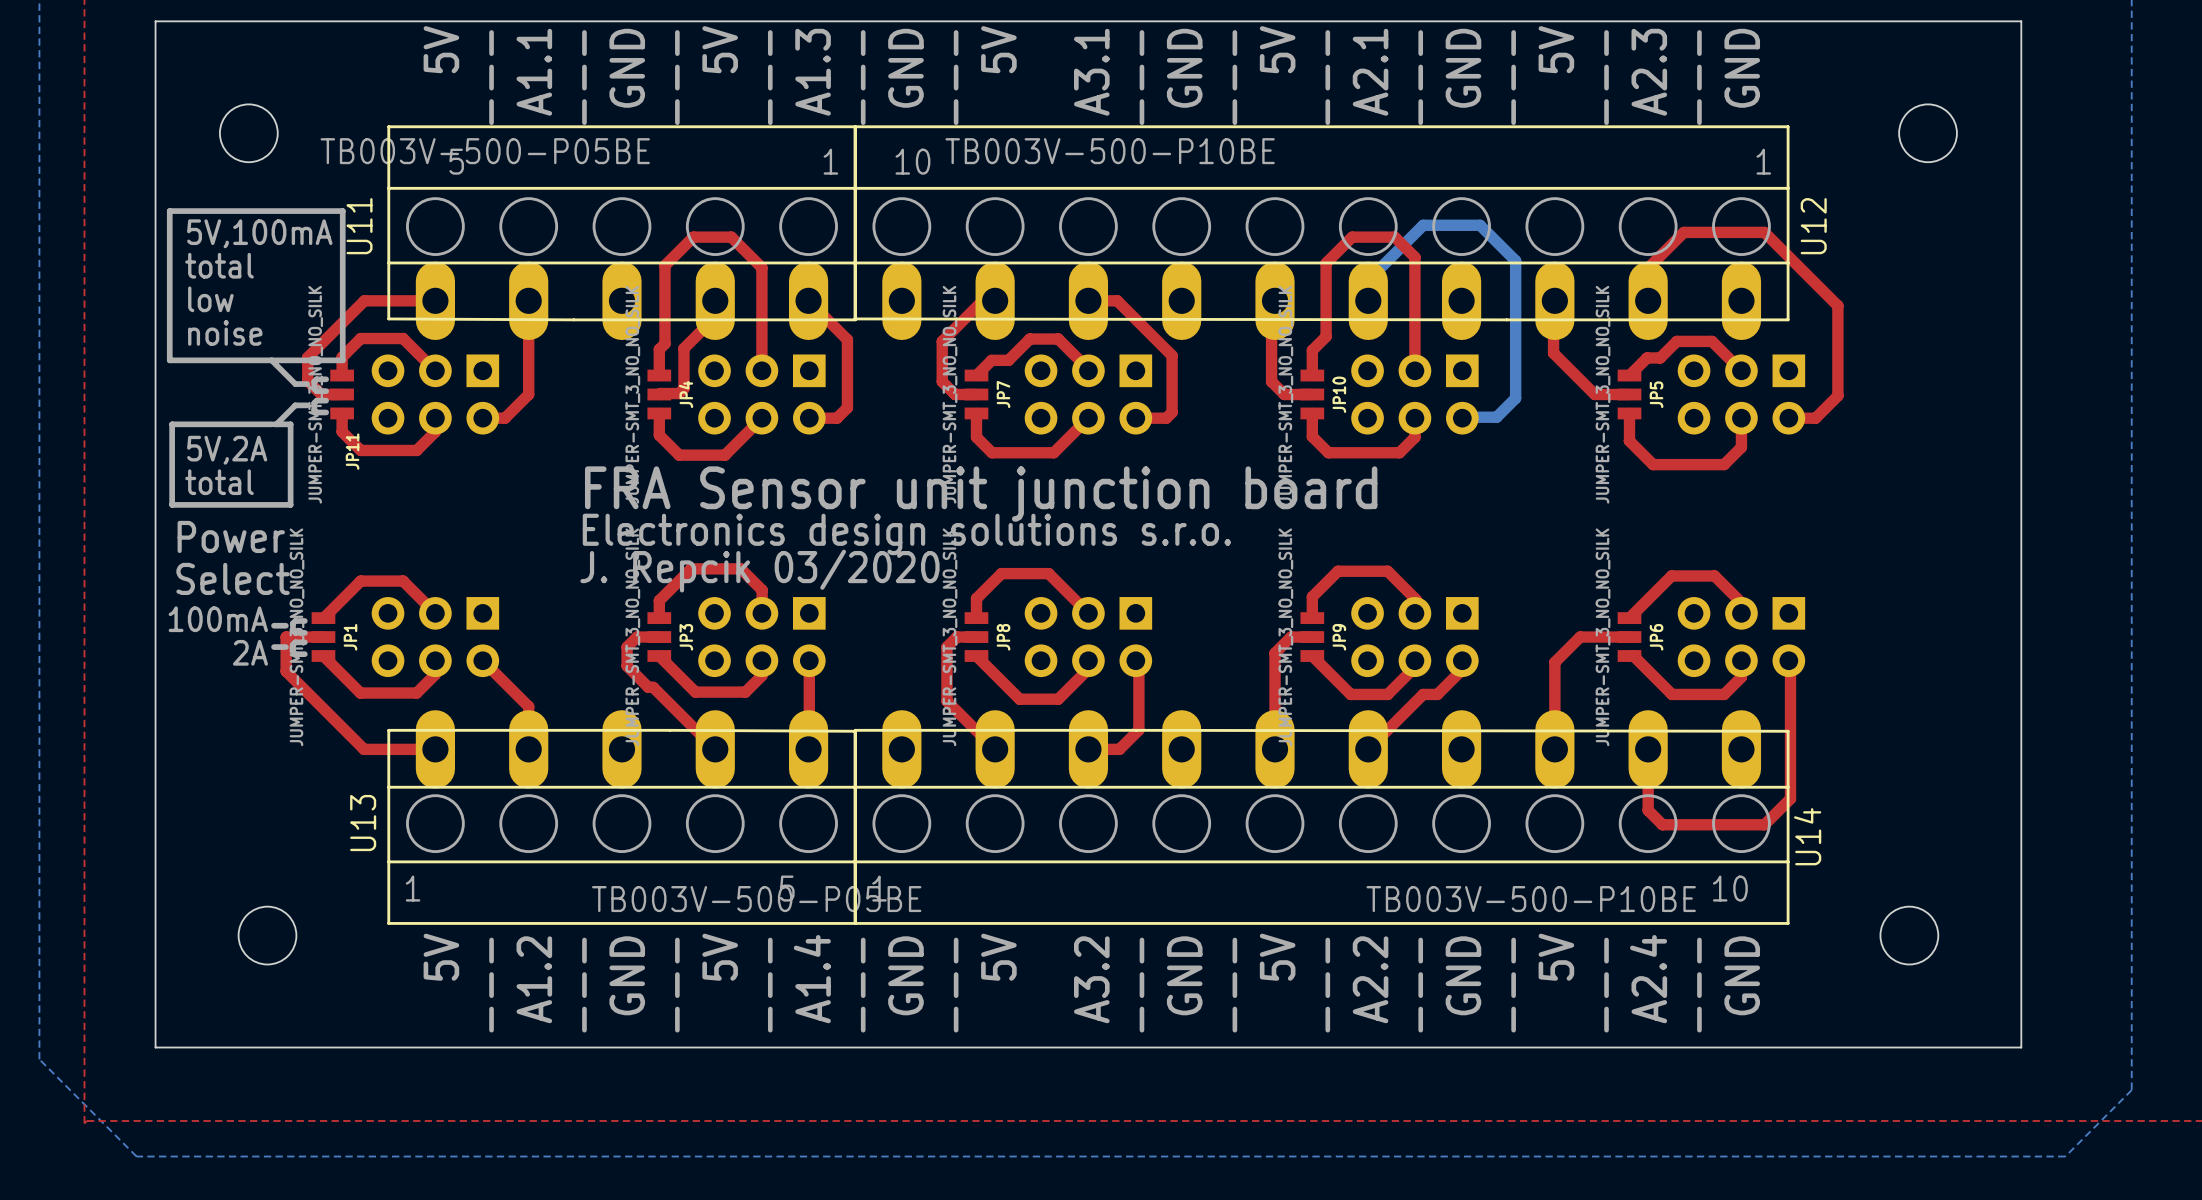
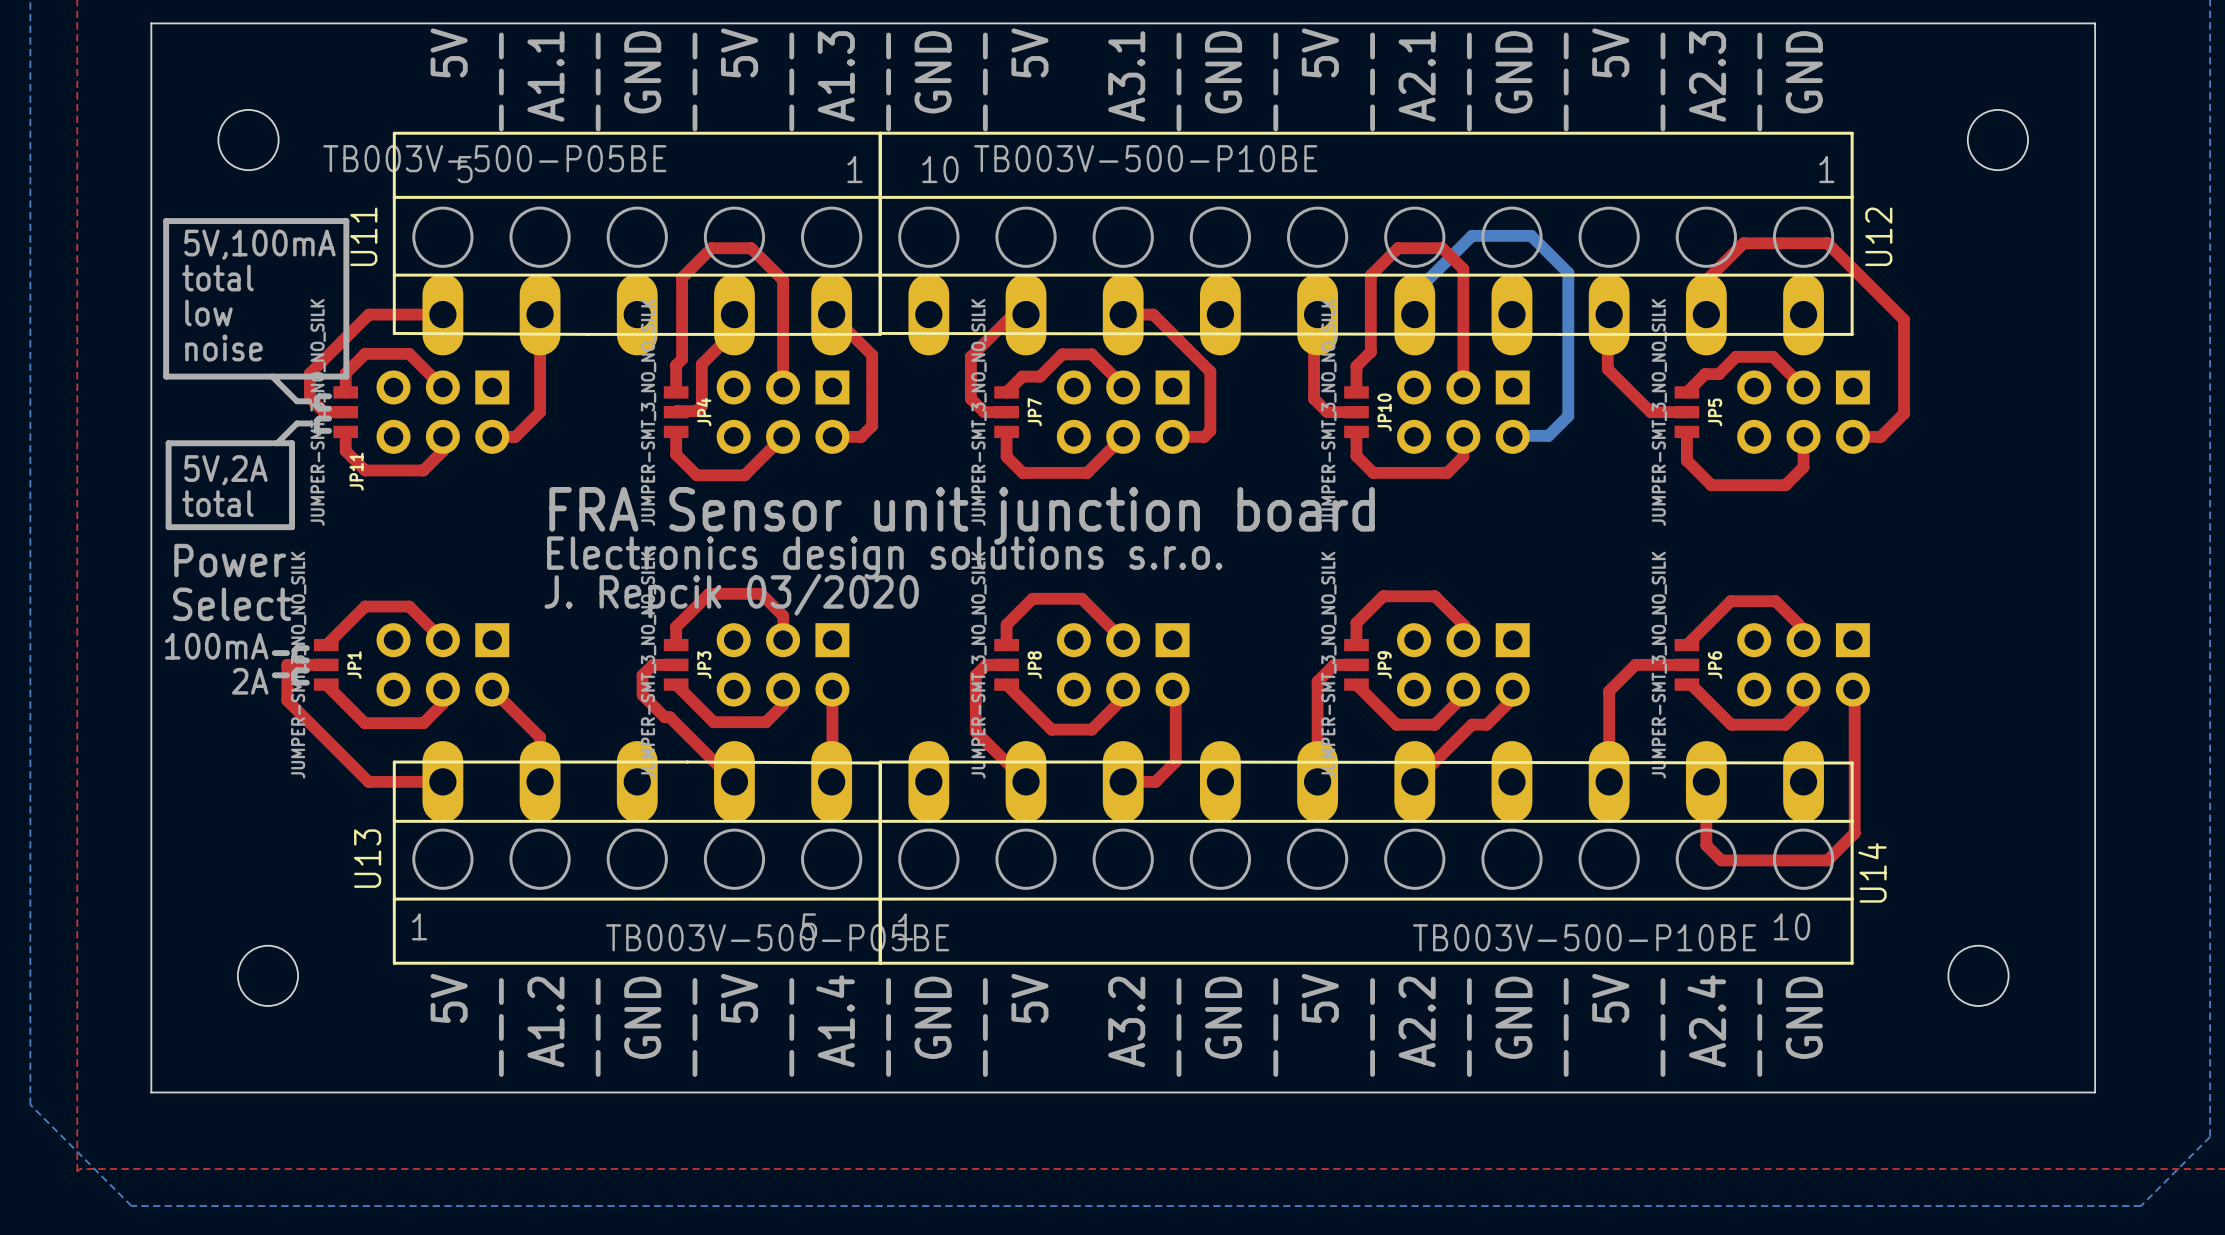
text position: FRA Sensor unit junction board (981, 494) -> FRA Sensor unit junction board (962, 515)
text position: Electronics design solutions s.r.o. (906, 534) -> Electronics design solutions s.r.o. (884, 557)
text position: J. Repcik 03/2020 (759, 571) -> J. Repcik 03/2020 (731, 596)

